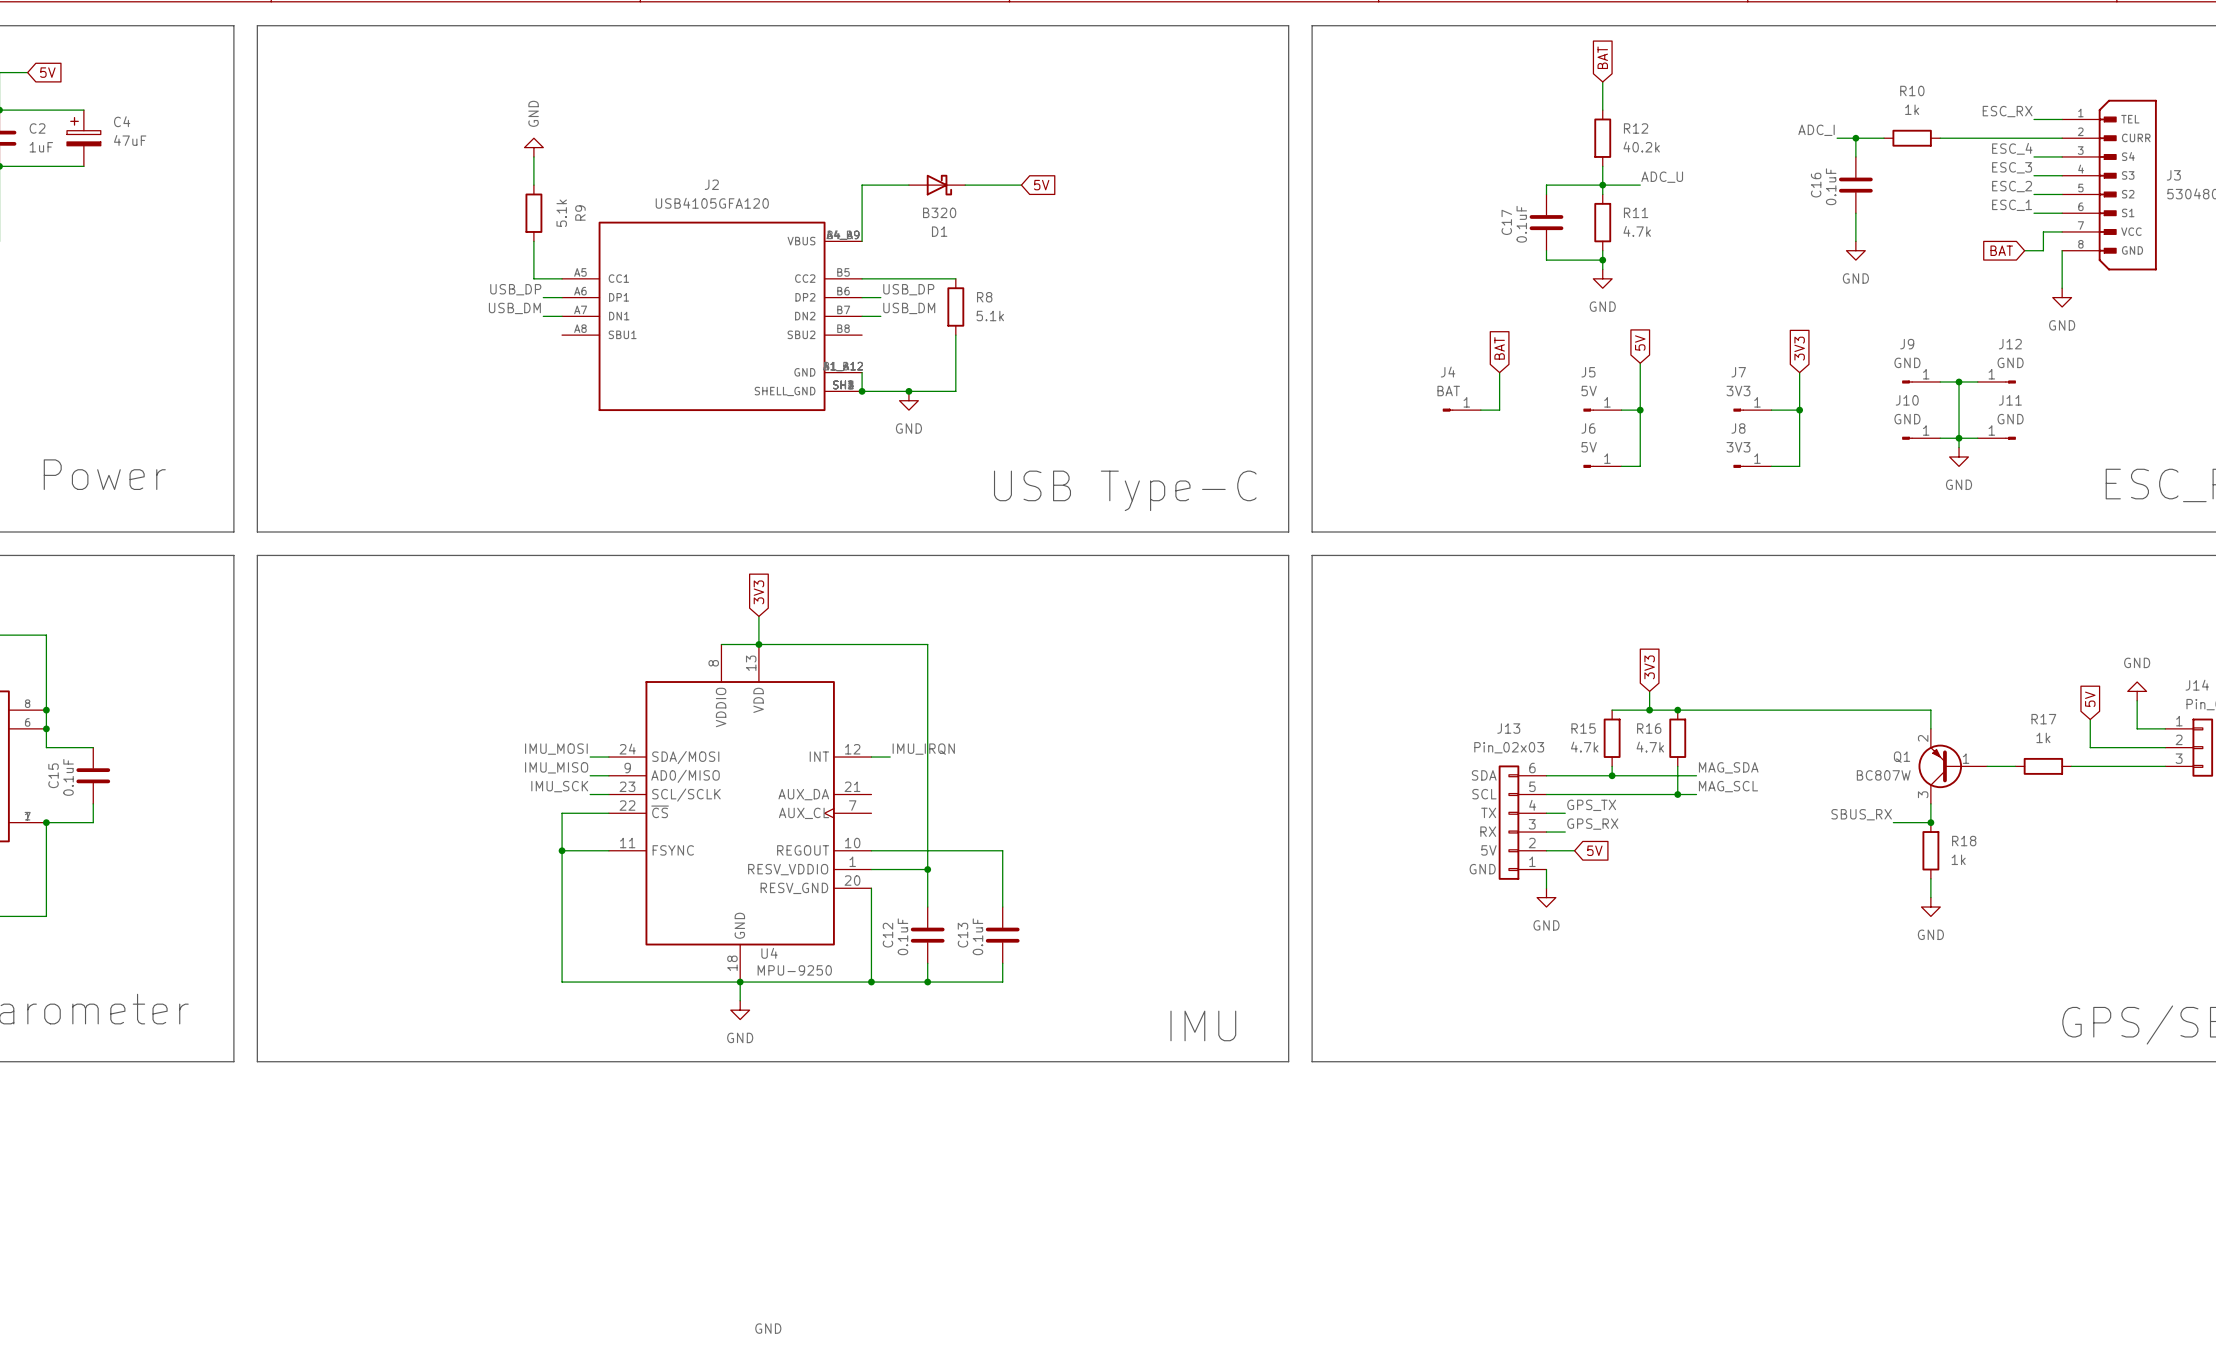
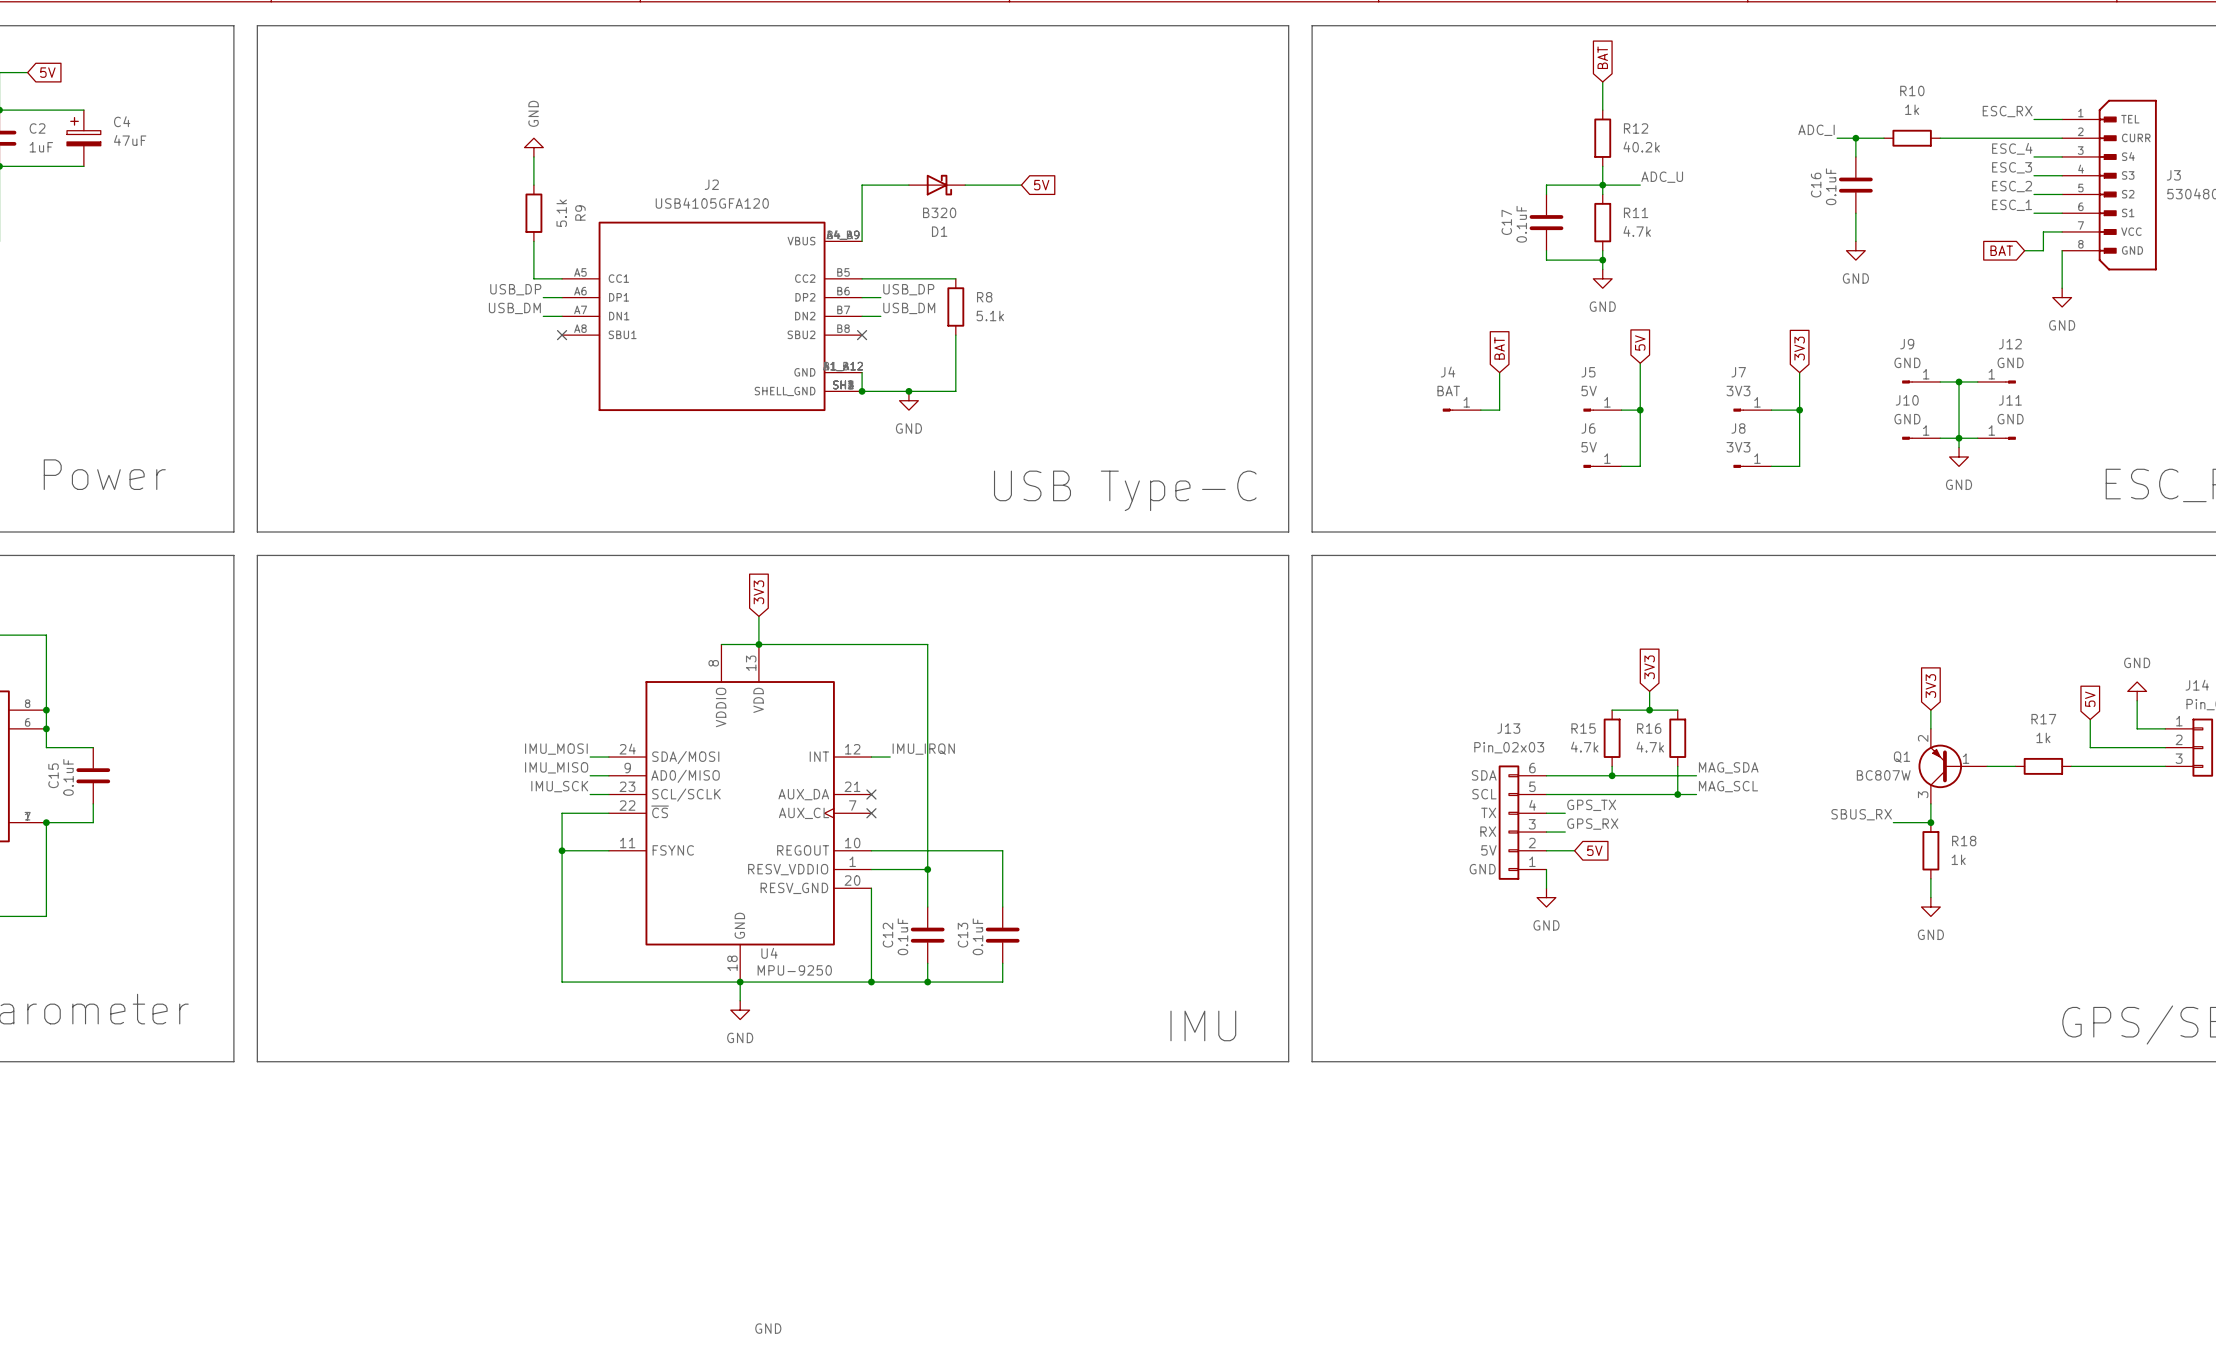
no-connect mark: none -> (562, 335)
no-connect mark: none -> (862, 335)
global label: none -> 3V3 (1930, 686)
wire: (1677, 710) (1930, 710) -> none
junction: (1677, 710) -> none
no-connect mark: none -> (871, 794)
no-connect mark: none -> (871, 813)

